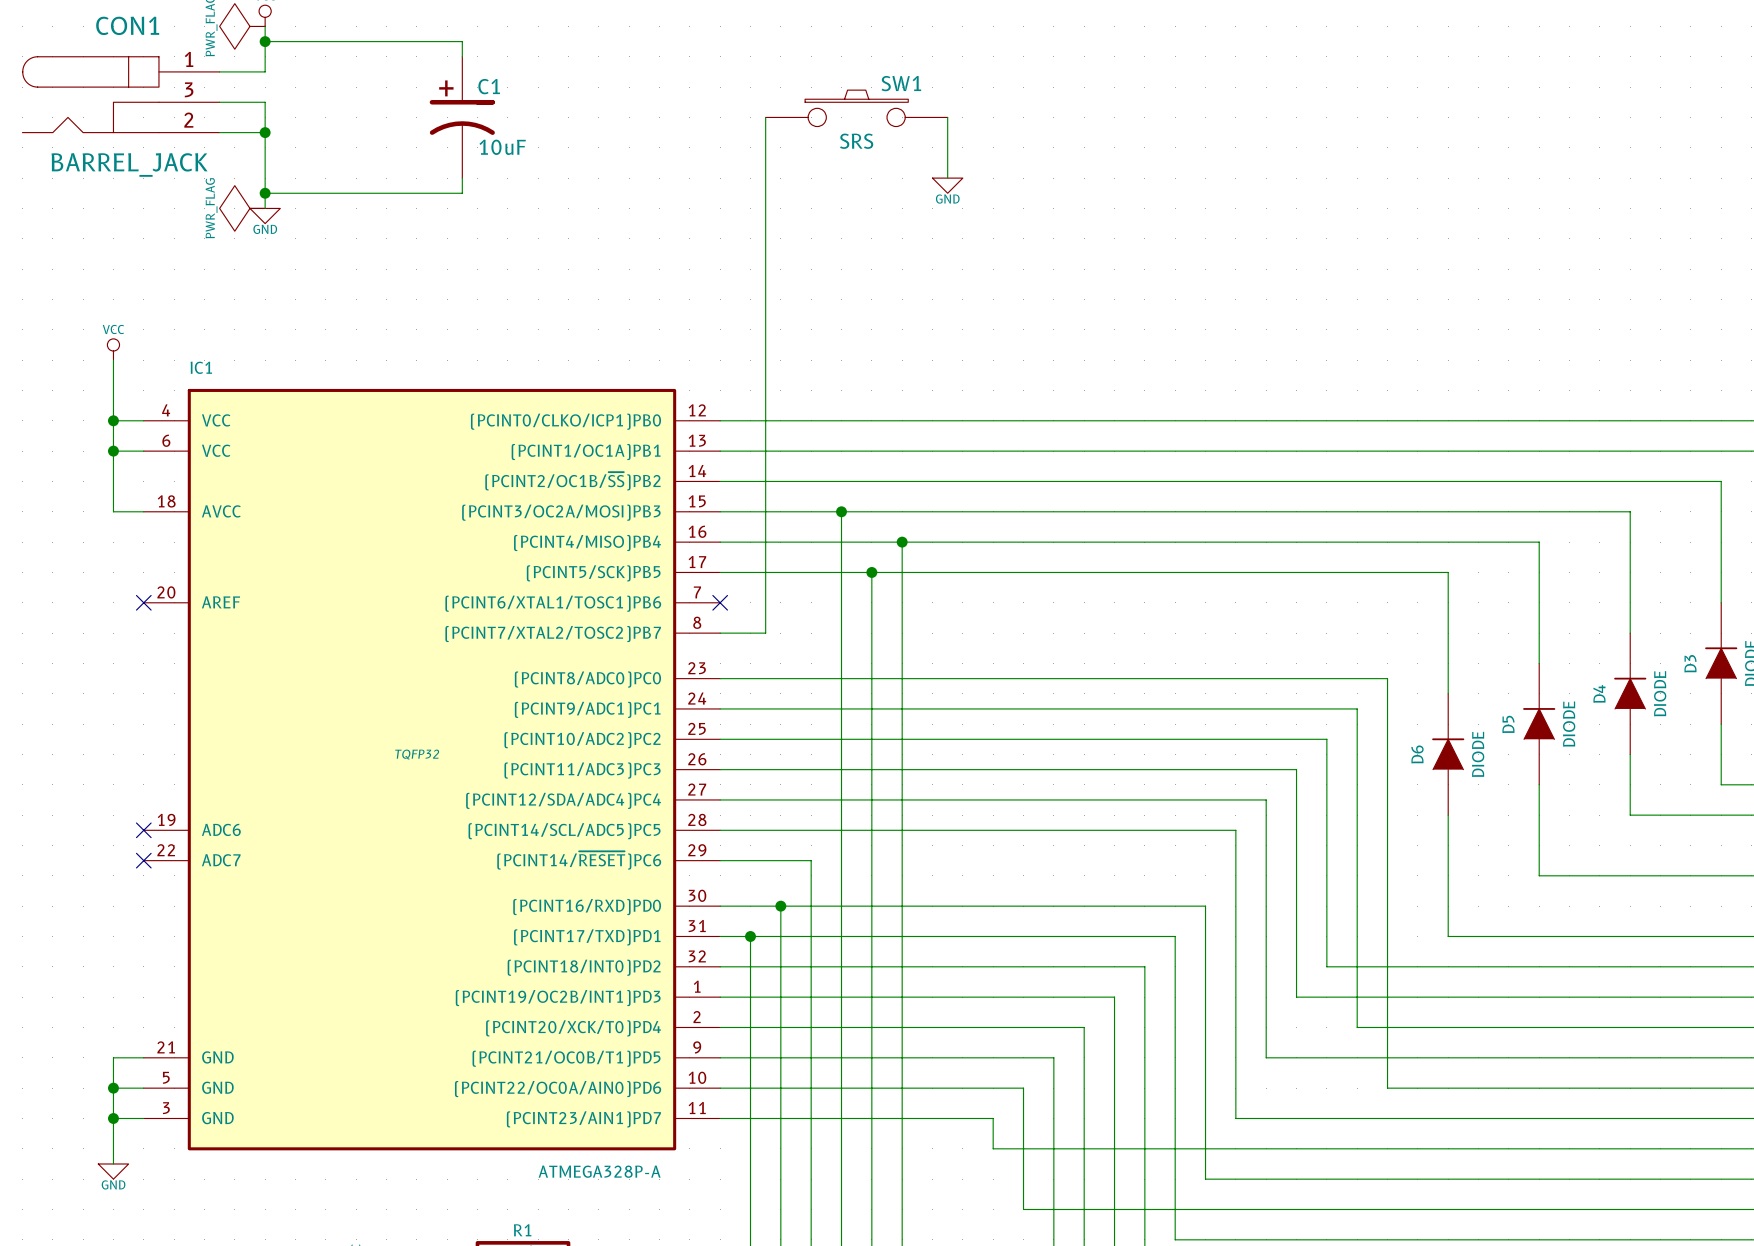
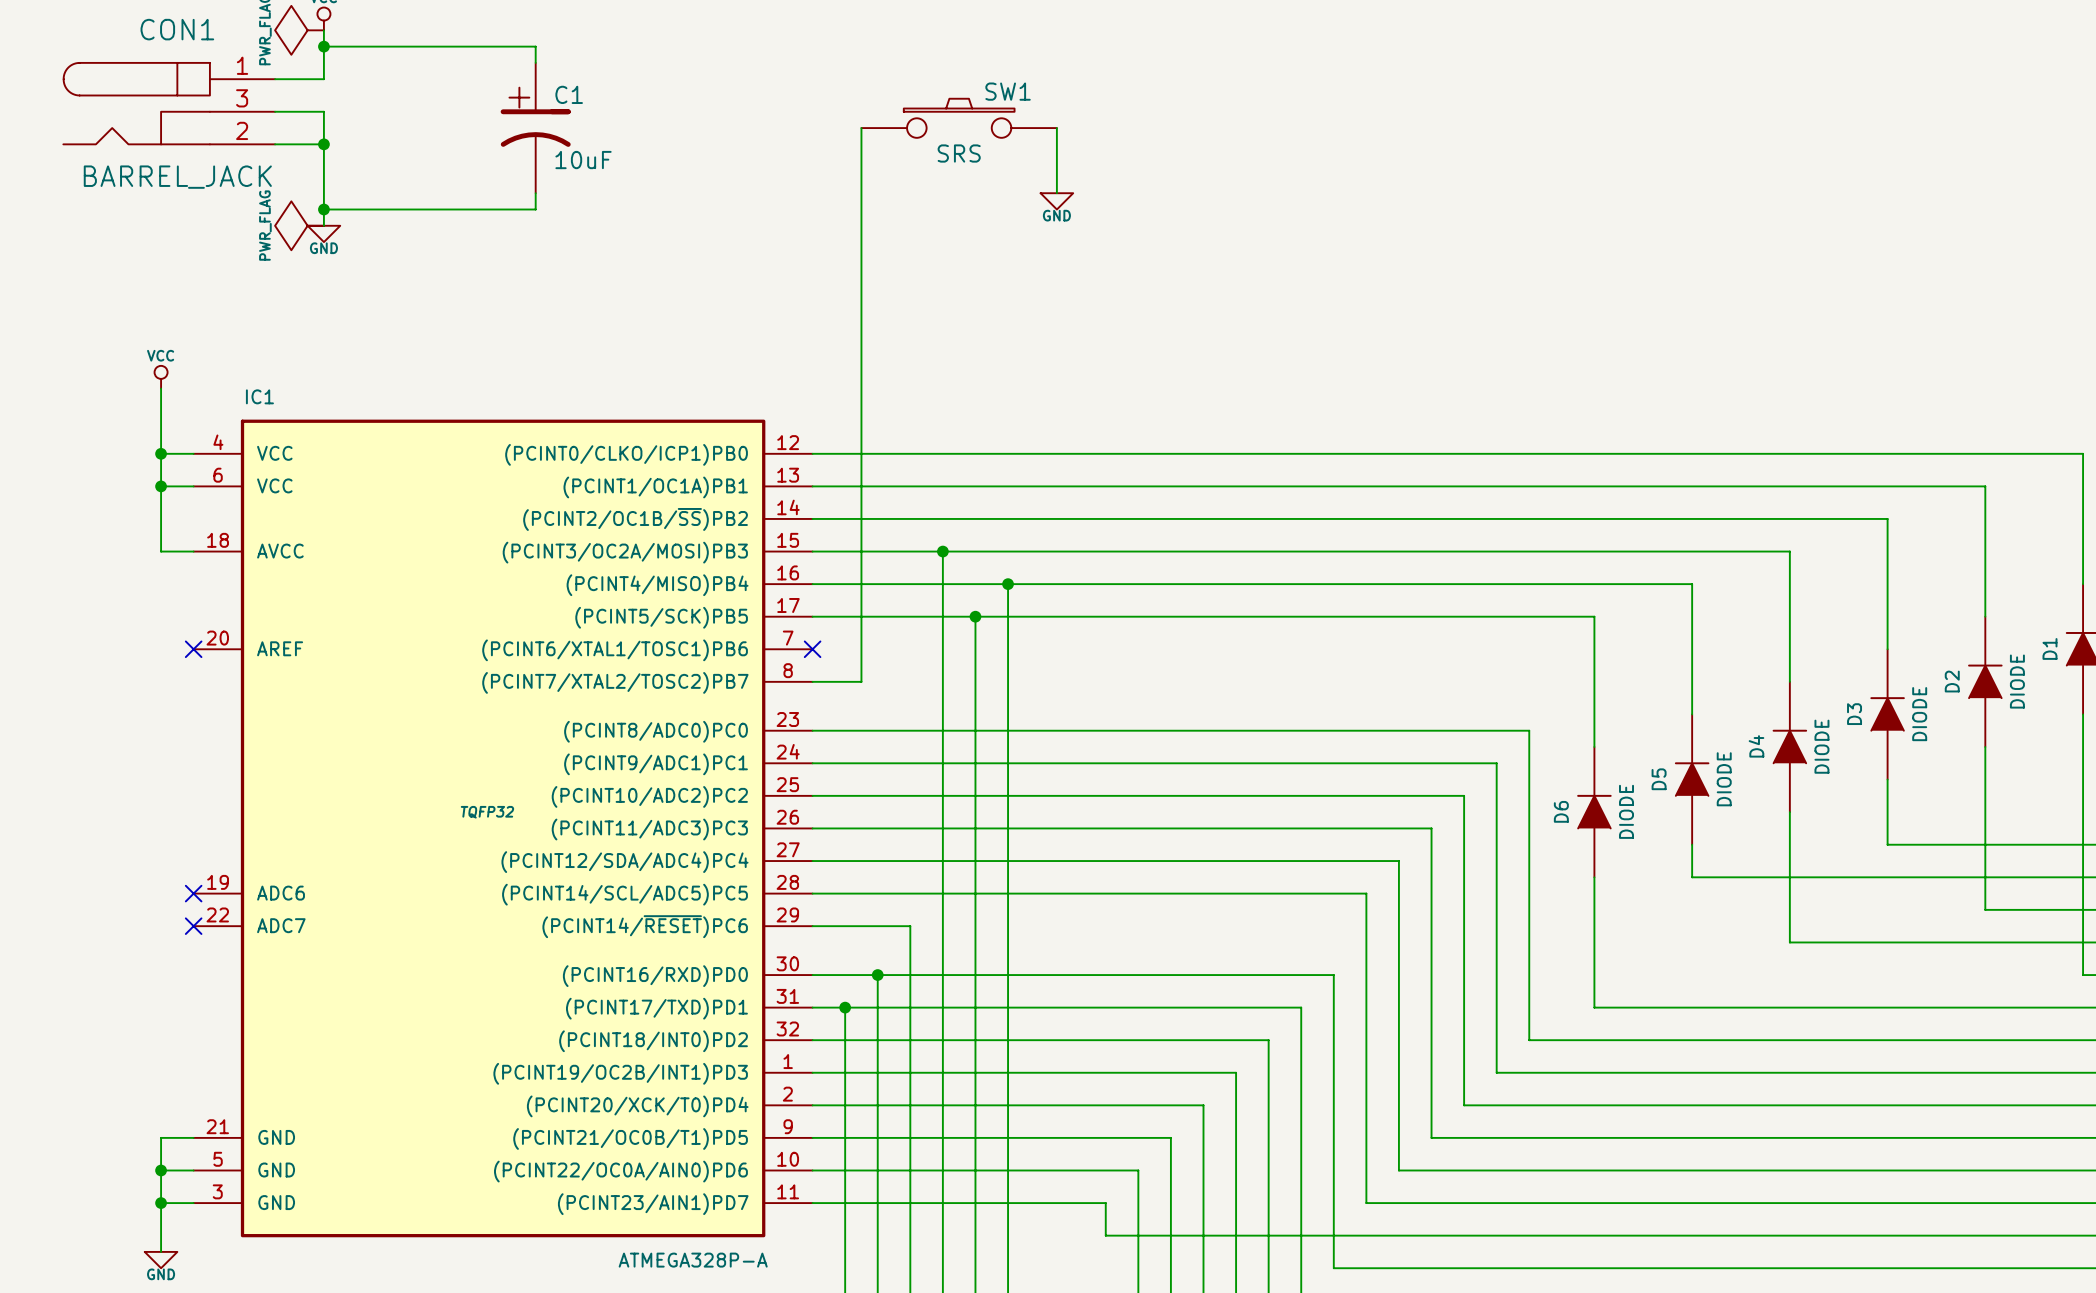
wire: (1539, 815) (1539, 875) (1630, 875) -> (1692, 877) (1789, 877) (1789, 942)
wire: (1326, 966) (1387, 966) (1387, 1088) -> (1398, 1137) (1398, 1170) (1529, 1170)
wire: (1296, 997) (1357, 997) (1357, 1027) -> (1464, 1040) (1464, 1105) (1496, 1105)
wire: (1266, 1057) (1296, 1057) -> (1431, 1072) (1431, 1137)

